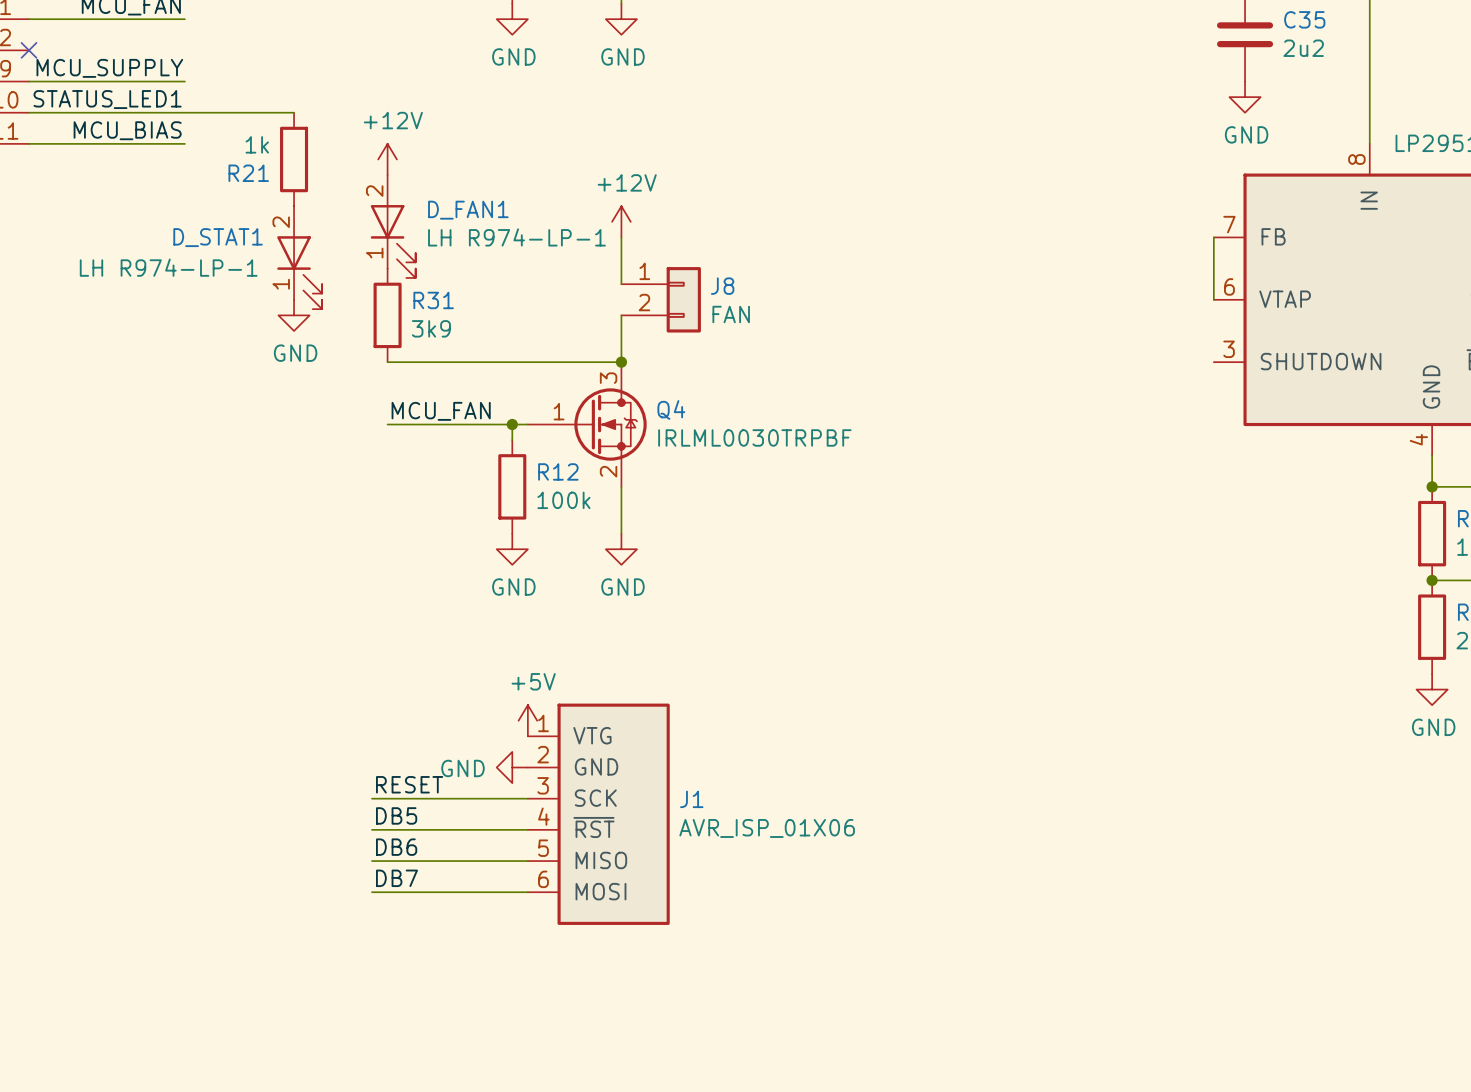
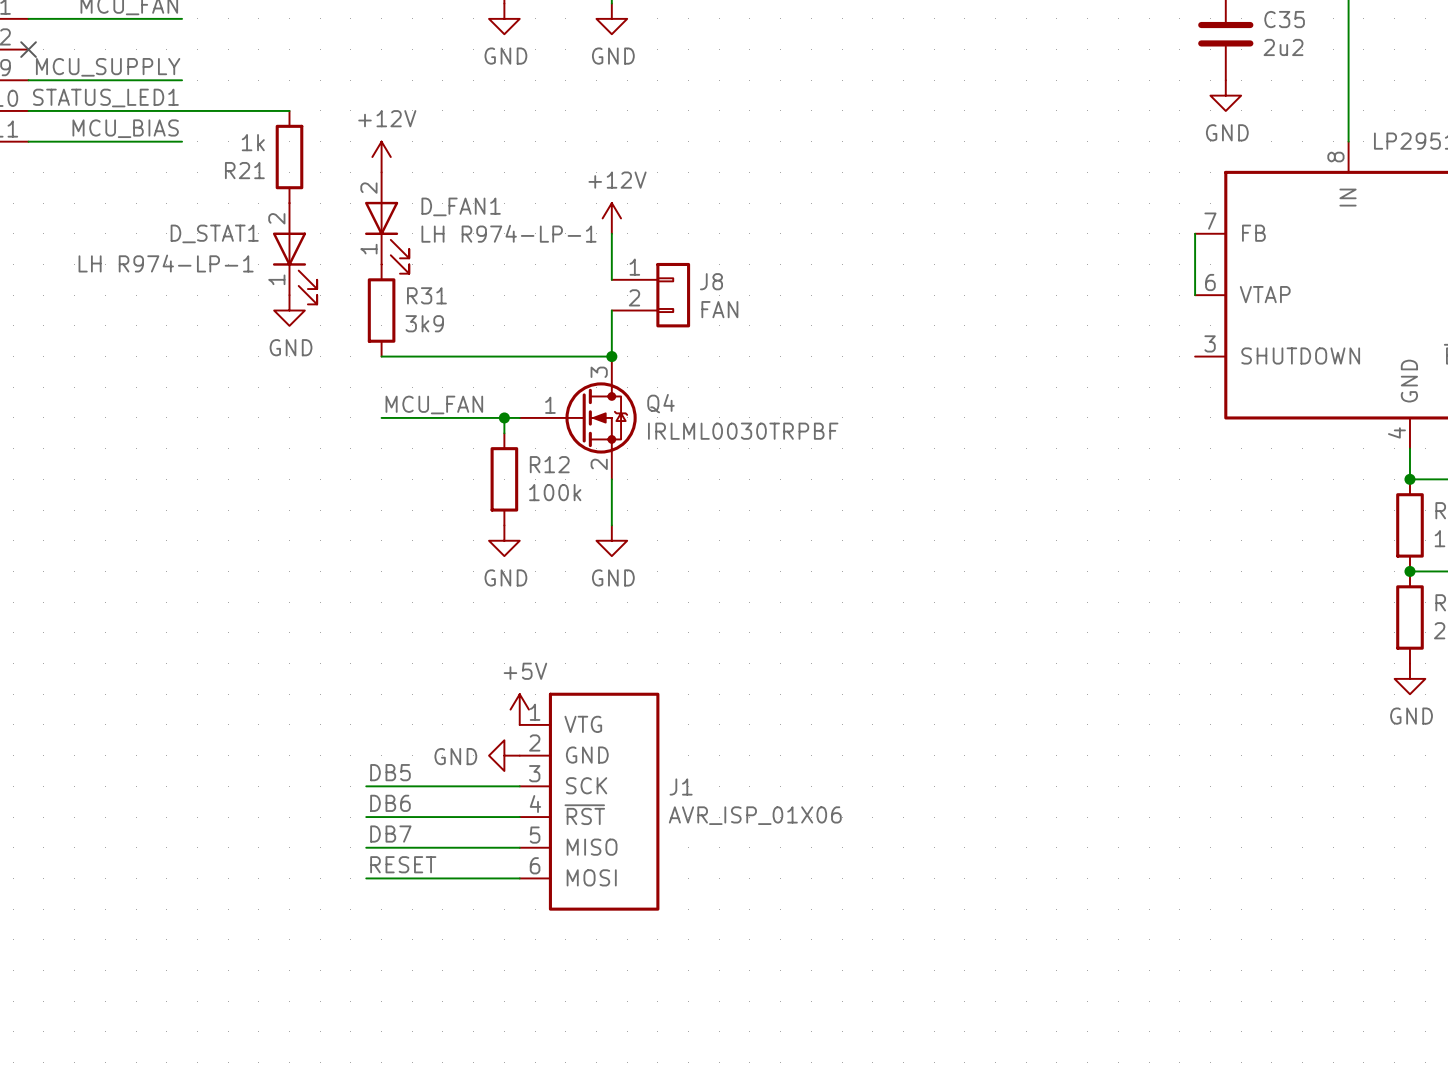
label: RESET (409, 784) -> DB5 (390, 772)
label: DB5 (396, 815) -> DB6 (390, 803)
label: DB6 (396, 847) -> DB7 (390, 834)
label: DB7 (396, 878) -> RESET (403, 864)

